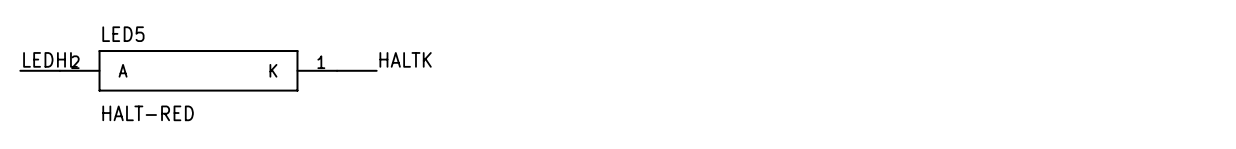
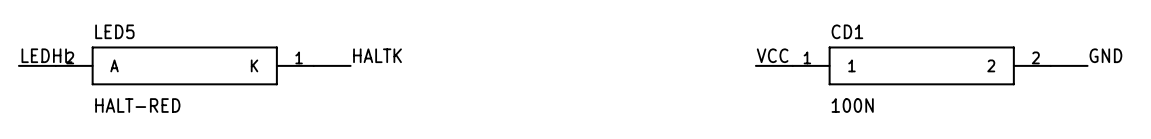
label: none -> VCC (772, 55)
label: none -> GND (1105, 55)
wire: none -> (755, 65) (792, 65)
CD1: none -> 100N (921, 65)
wire: none -> (1050, 65) (1087, 65)

